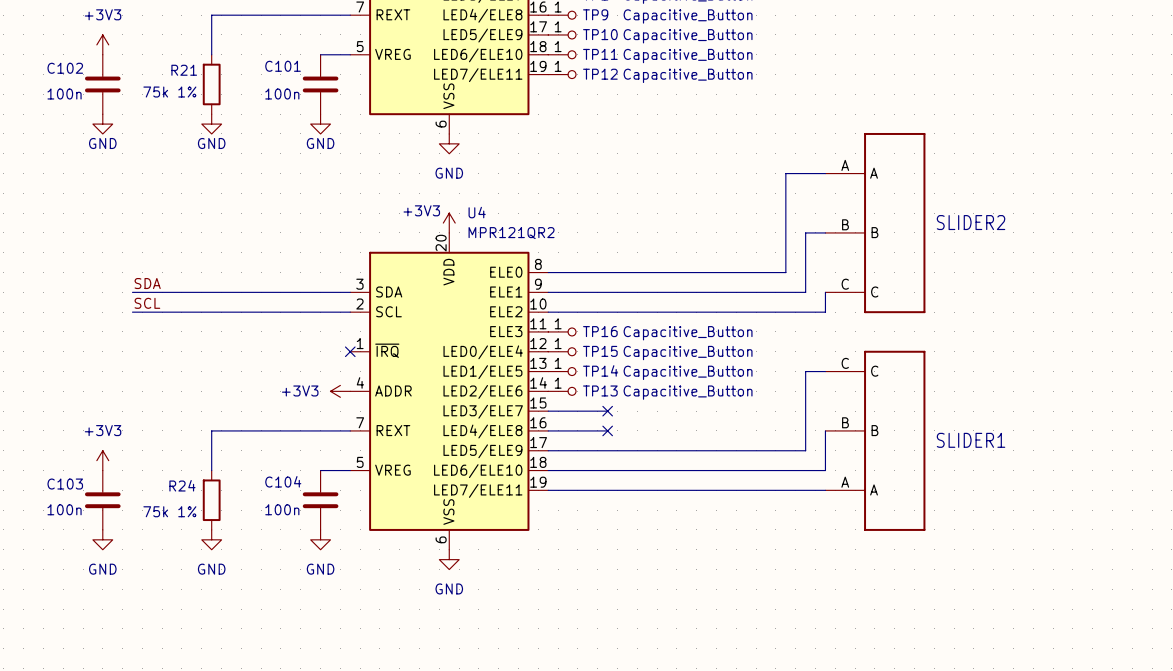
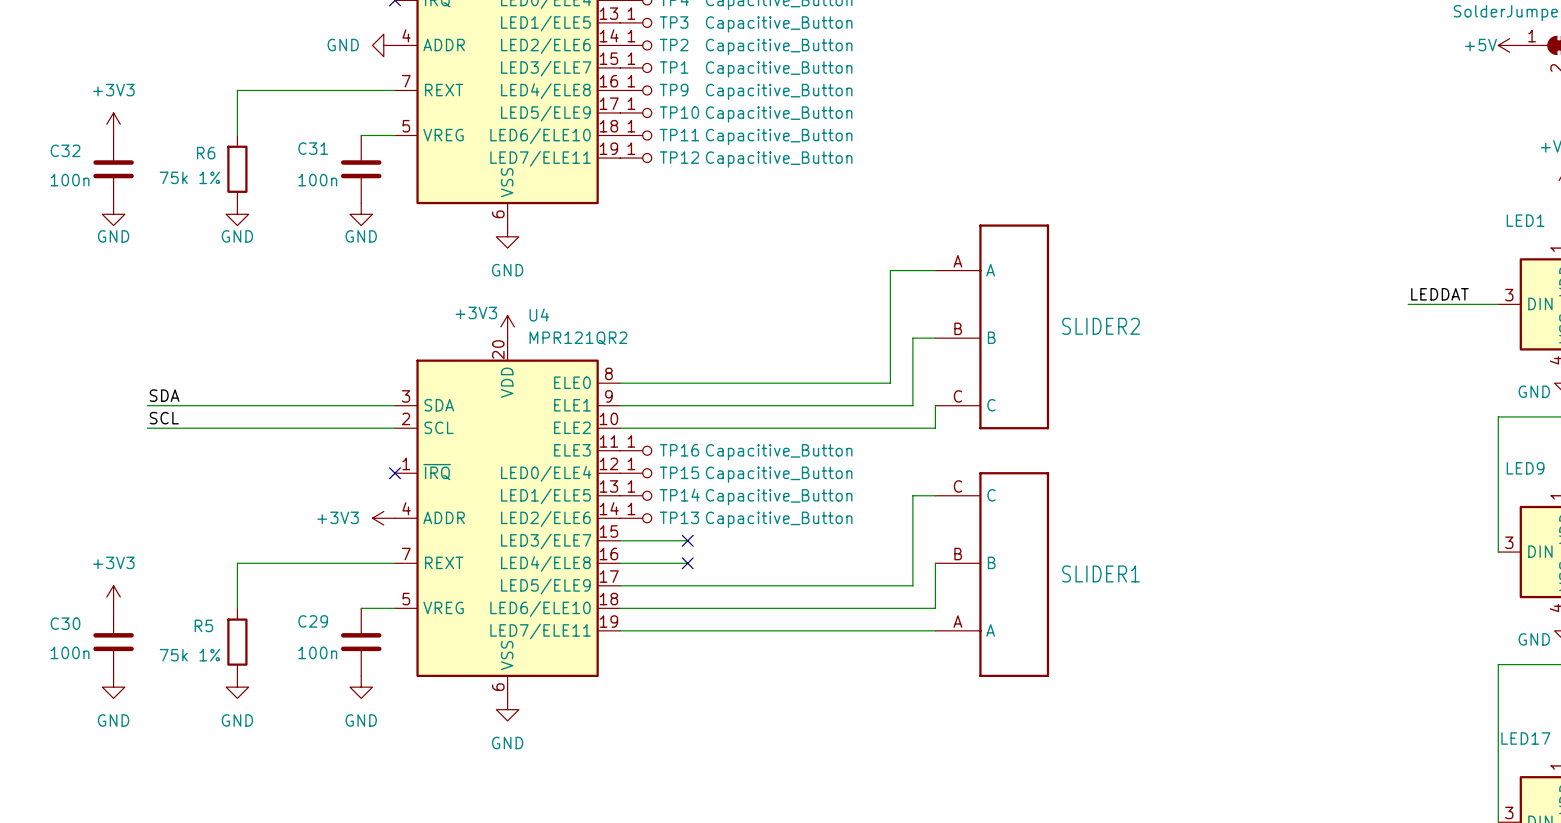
C101 name: C101 (283, 66) -> C31 (313, 148)
C102 name: C102 (65, 68) -> C32 (65, 150)
R21 name: R21 (184, 70) -> R6 (206, 153)
C104 name: C104 (283, 481) -> C29 (313, 621)
C103 name: C103 (65, 484) -> C30 (65, 623)
R24 name: R24 (182, 485) -> R5 (203, 625)

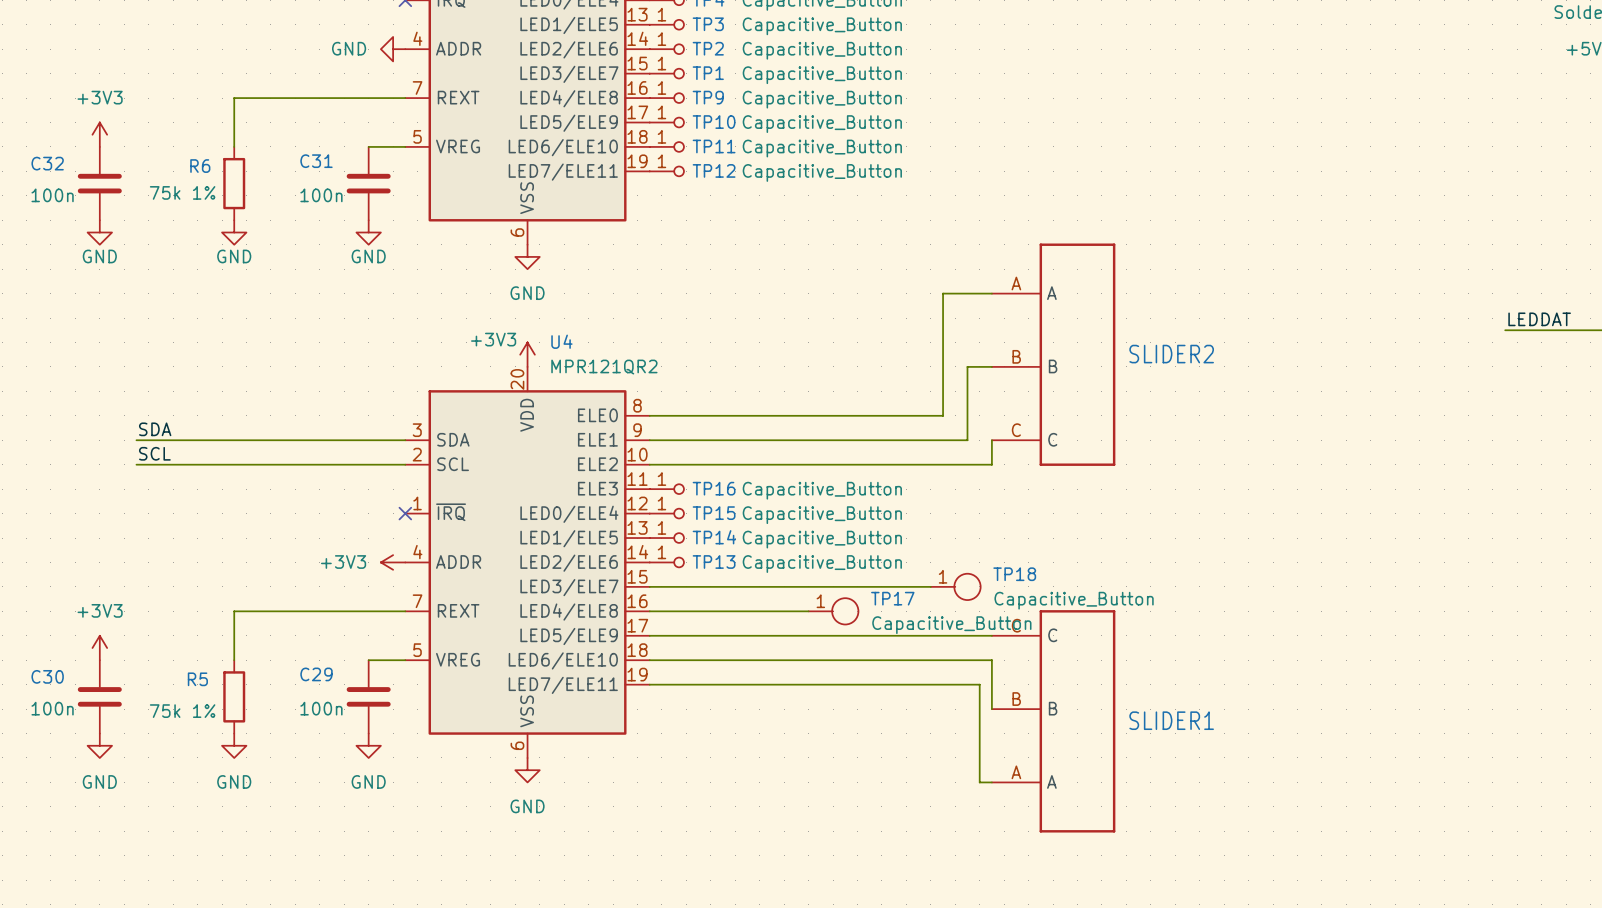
wire: (935, 495) (912, 495) (912, 585) -> (991, 635) (967, 635)
wire: none -> (723, 586) (930, 586)
no-connect mark: (687, 540) -> none
TP18: none -> Capacitive_Button (955, 586)
wire: none -> (723, 611) (808, 611)
no-connect mark: (687, 563) -> none
TP17: none -> Capacitive_Button (833, 611)
wire: (935, 563) (935, 608) -> (991, 709) (991, 660)
SLIDER1 position: (992, 574) -> (1053, 721)
wire: (924, 630) (935, 630) -> (979, 684) (979, 782) (991, 782)

